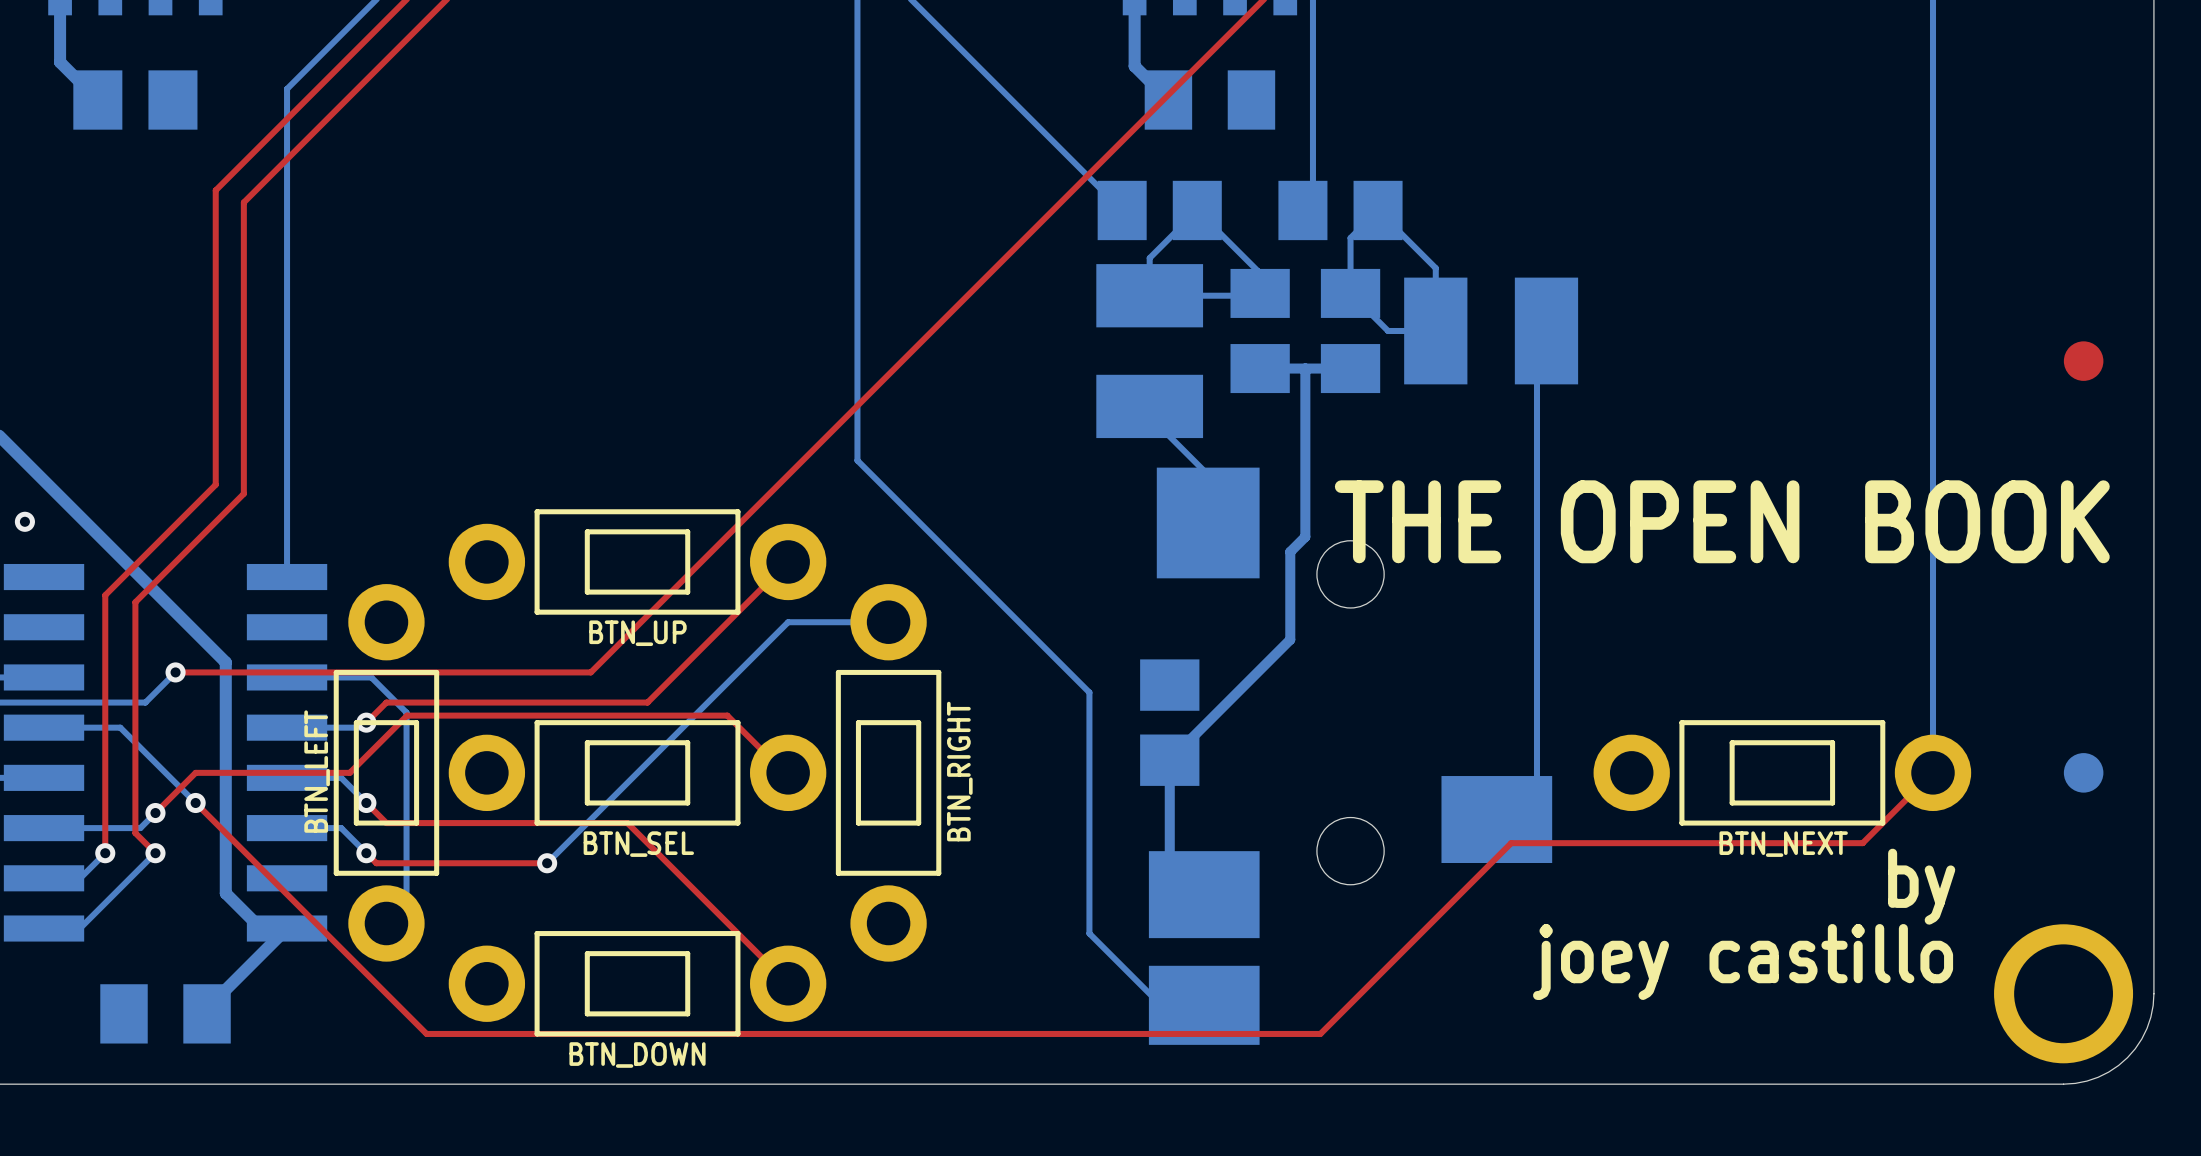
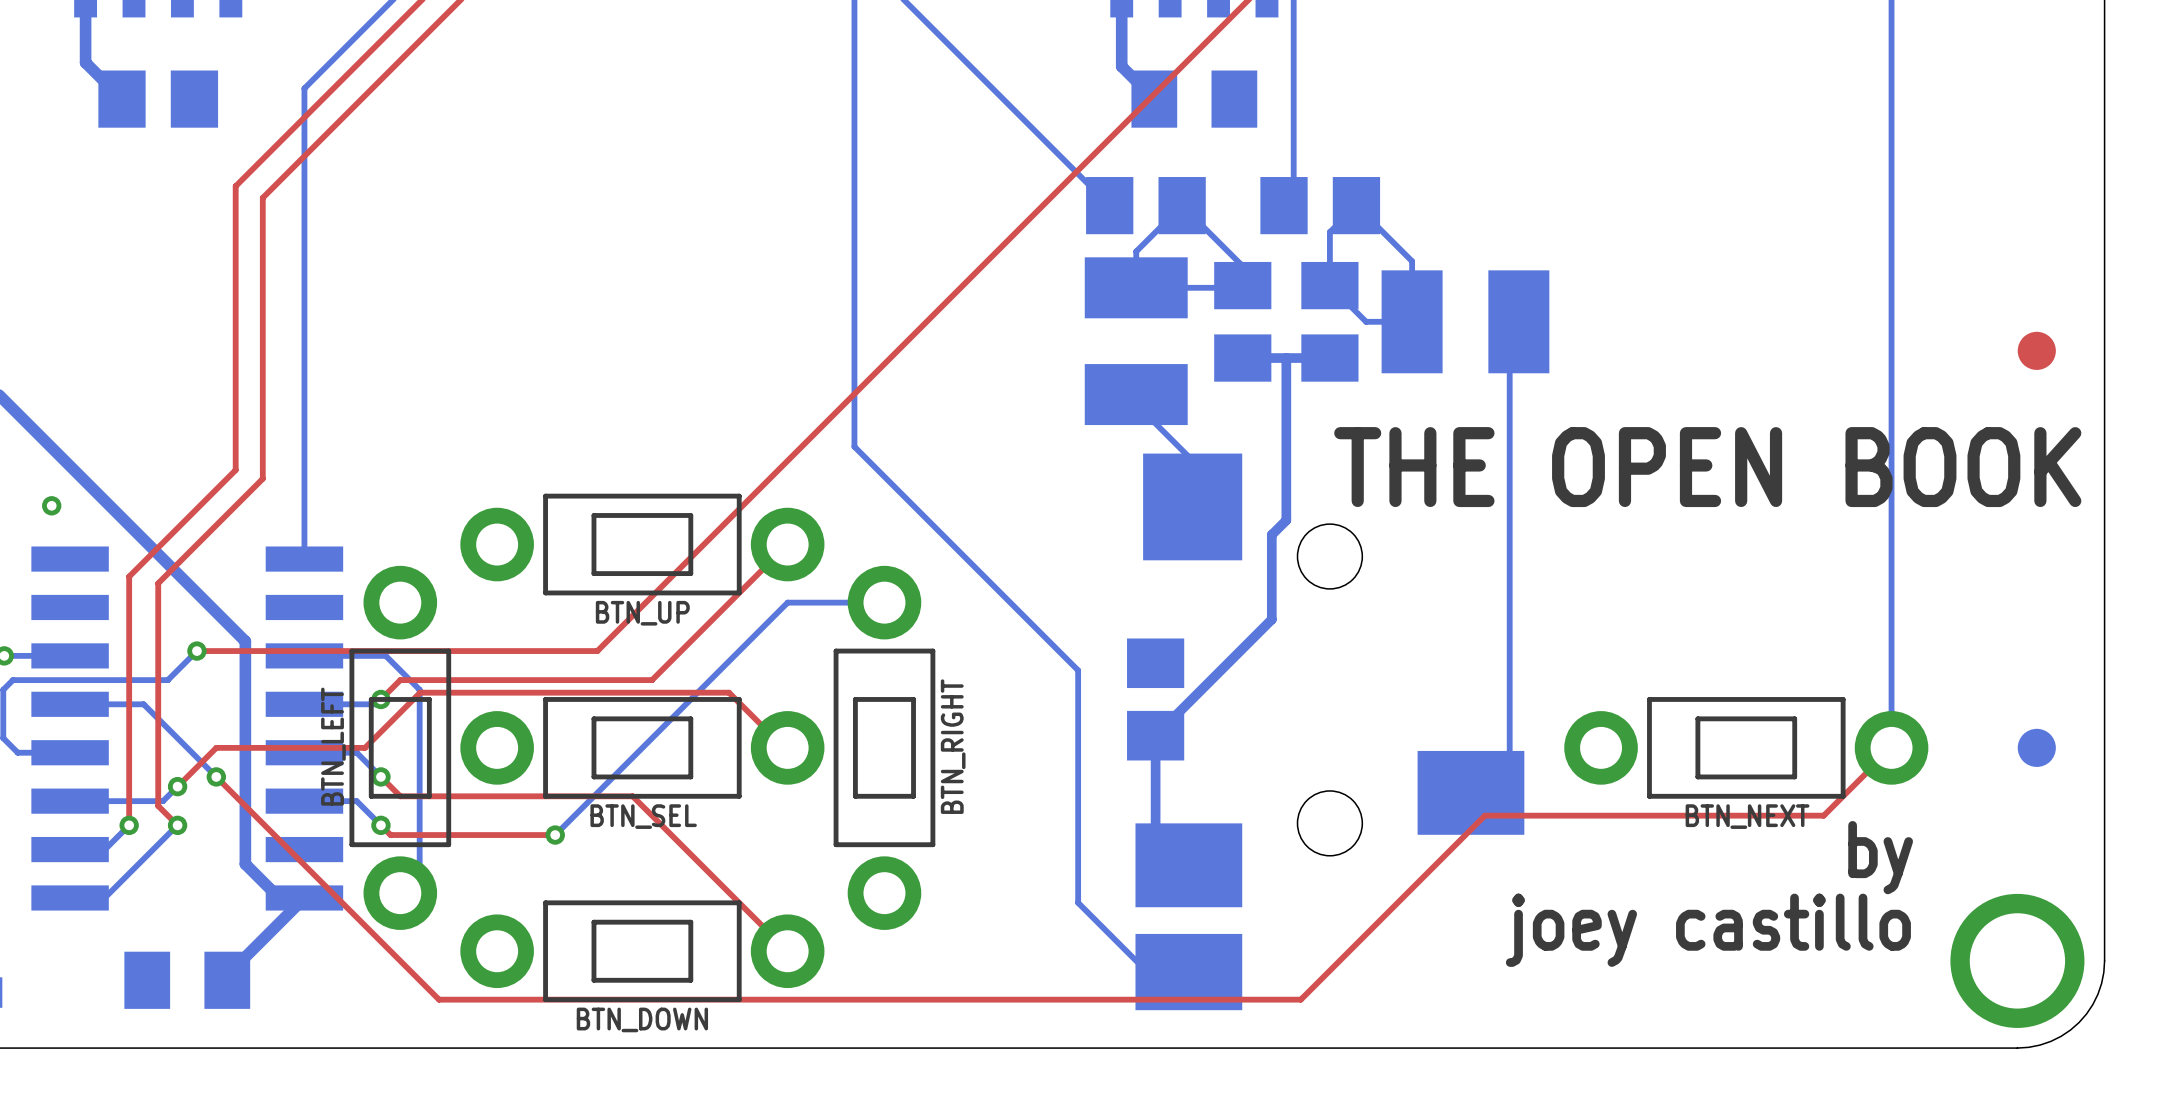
text position: THE OPEN BOOK (1722, 521) -> THE OPEN BOOK (1707, 467)

